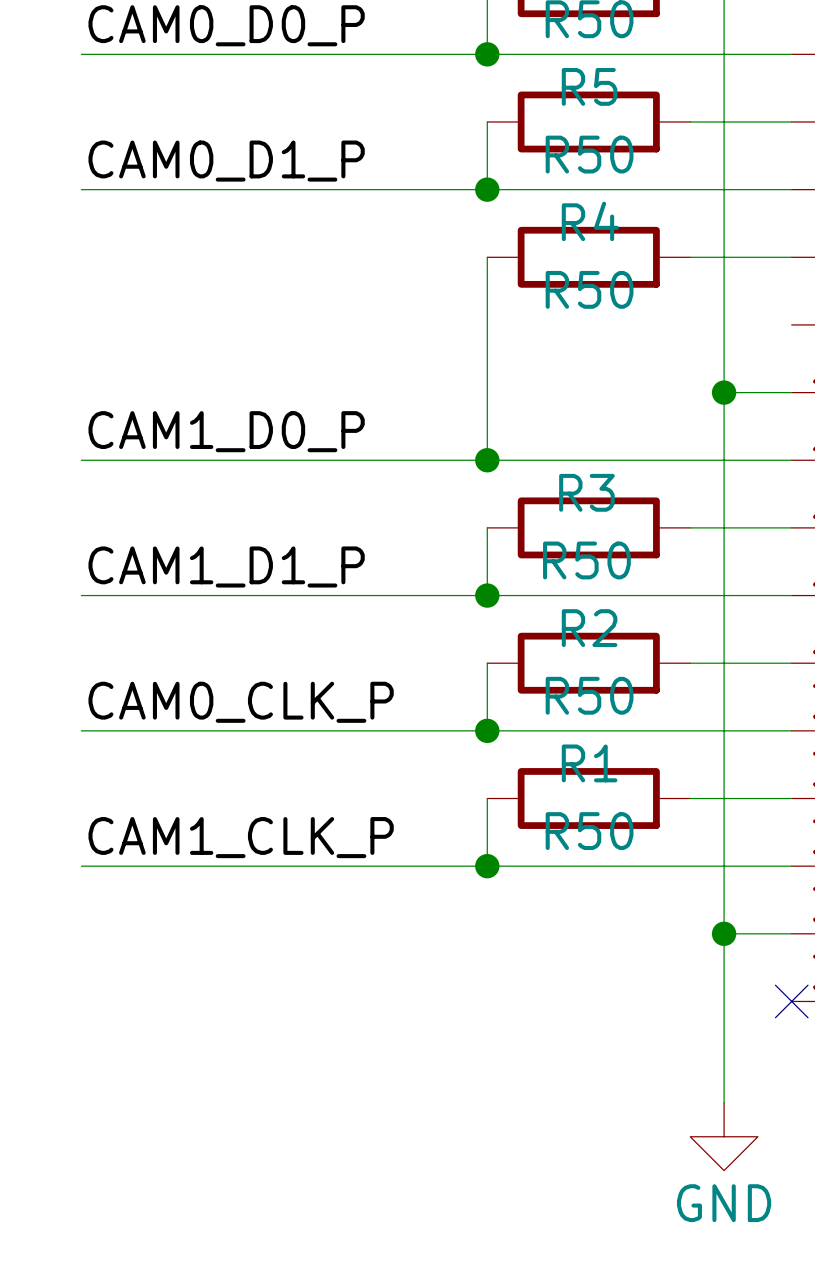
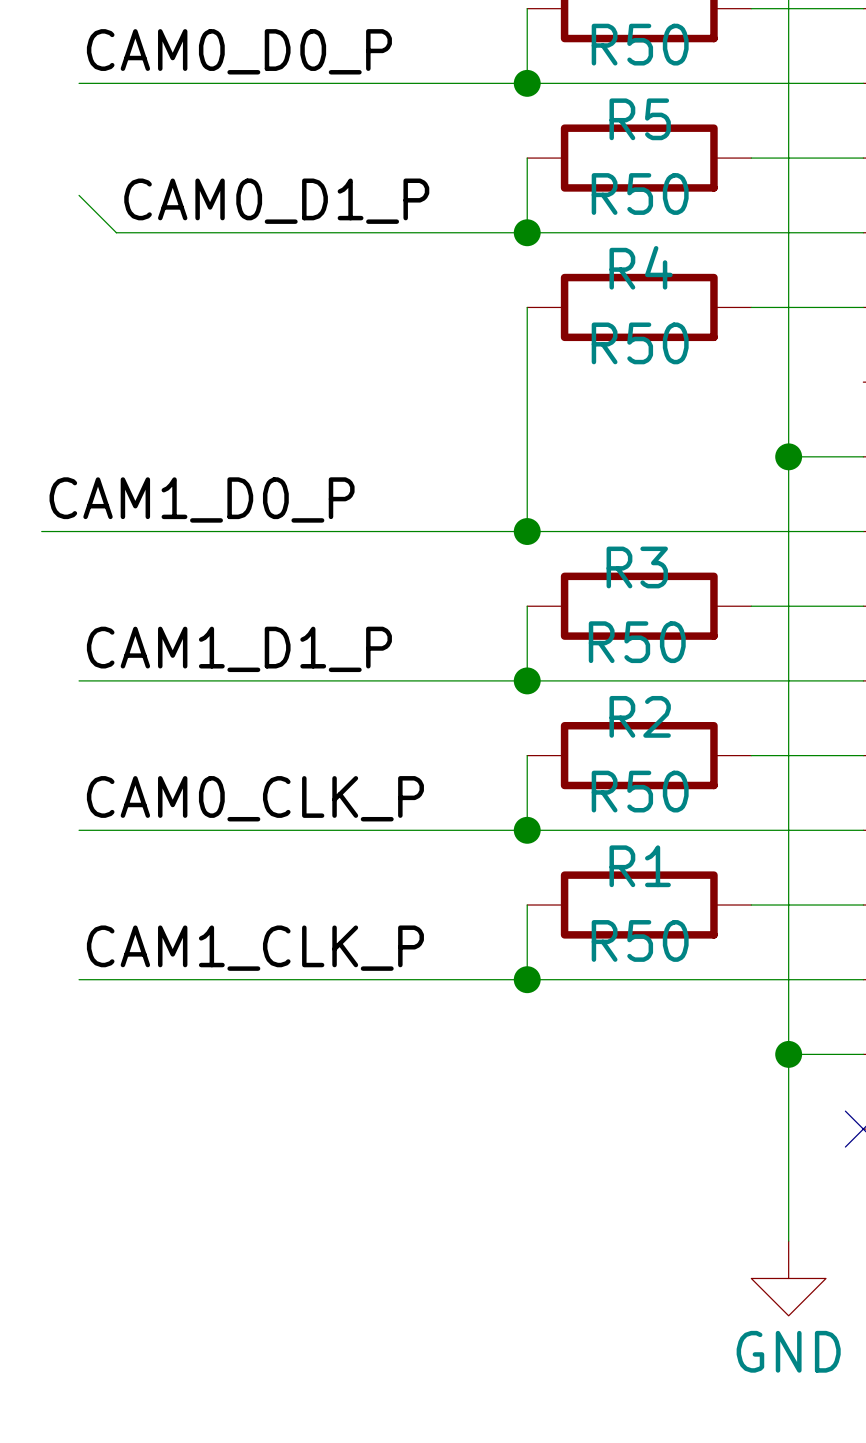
label position: CAM0_D1_P (226, 161) -> CAM0_D1_P (276, 201)
wire: (81, 189) (115, 189) -> (79, 195) (116, 232)
label position: CAM1_D0_P (226, 431) -> CAM1_D0_P (202, 499)
wire: none -> (41, 531) (79, 531)

